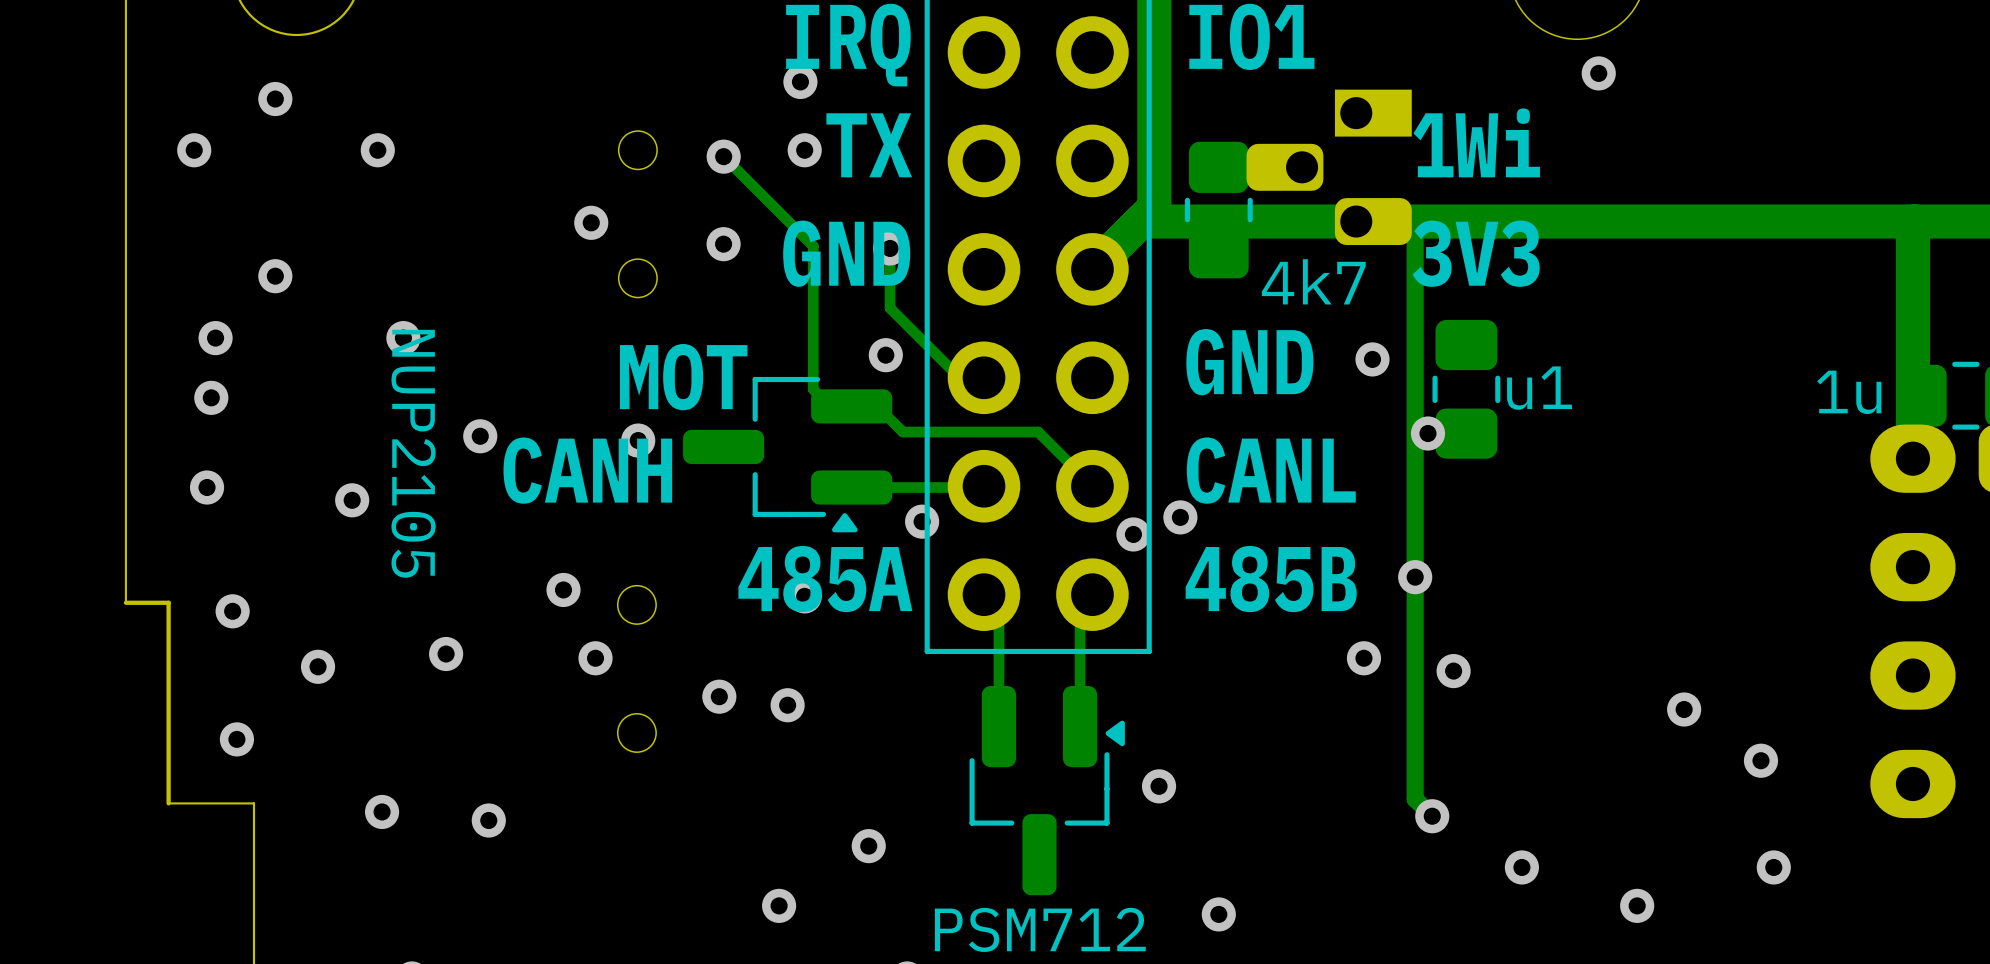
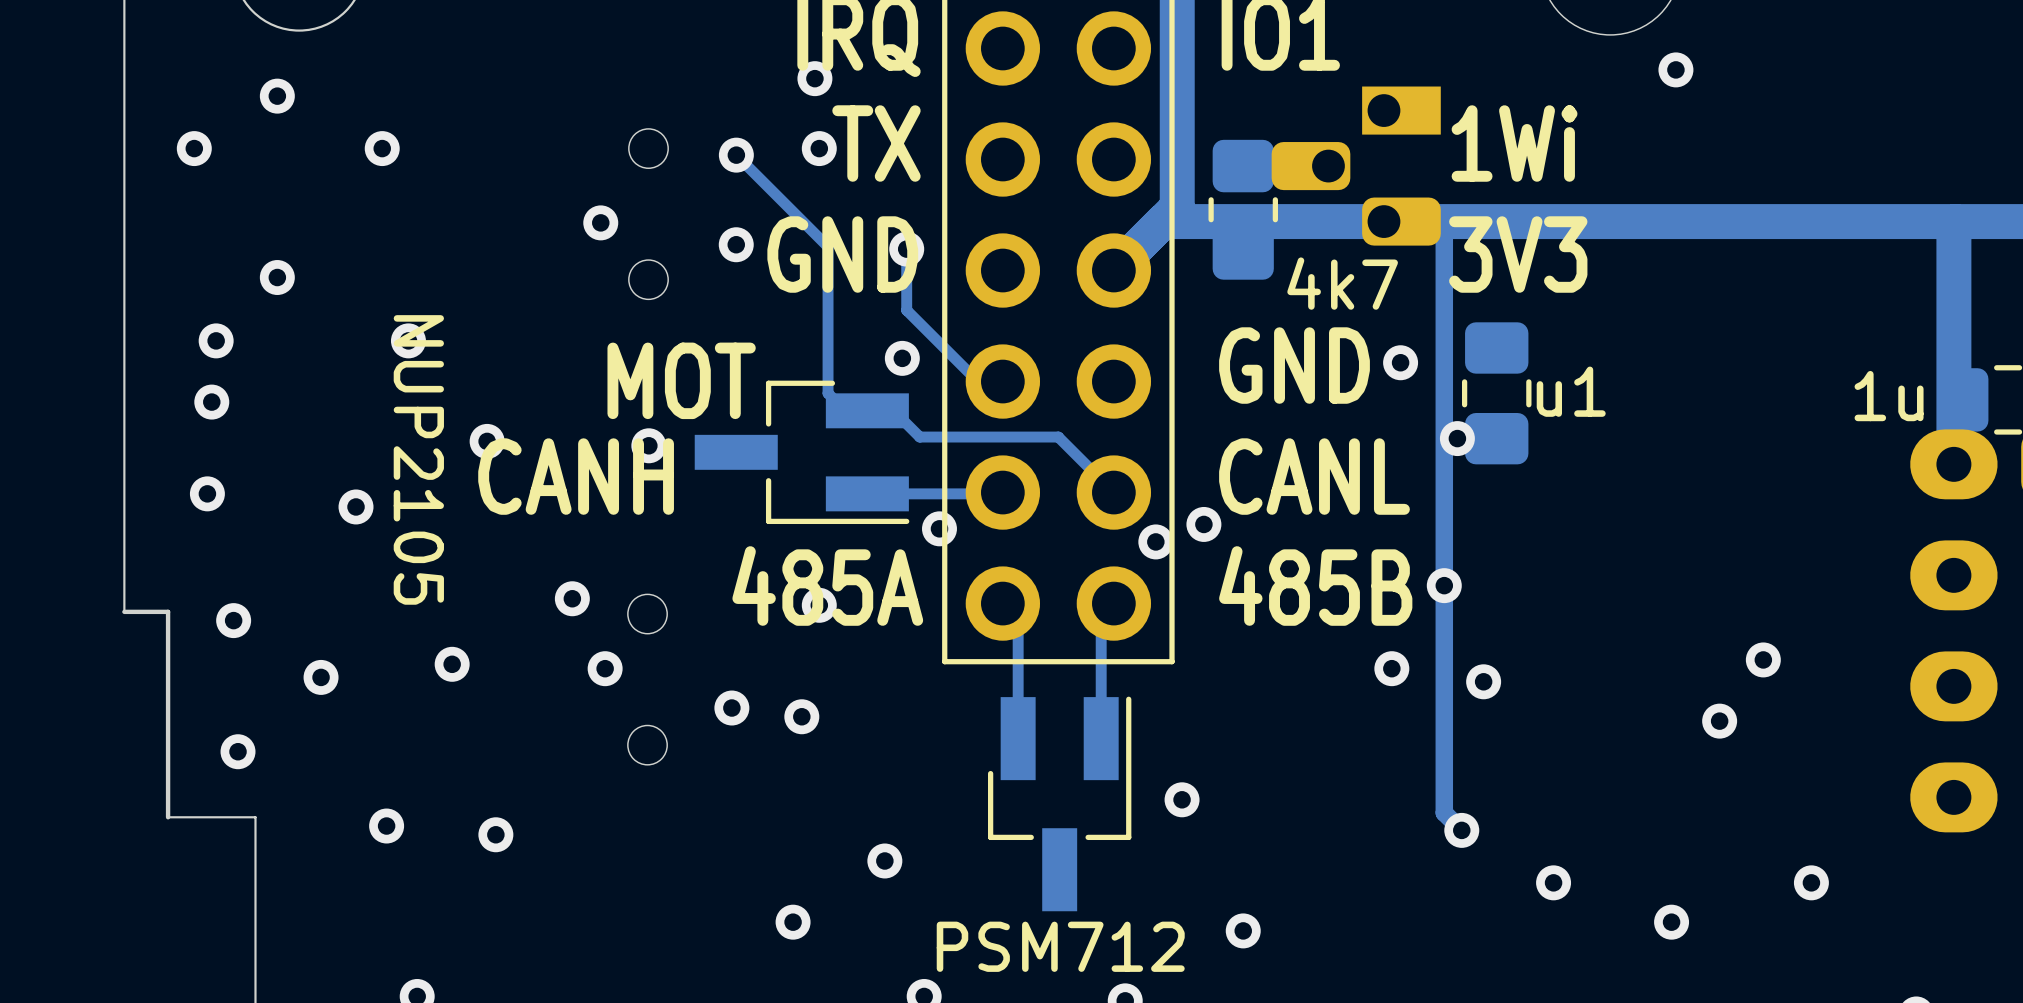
via position: (1598, 73) -> (1675, 69)
part footprint: [683, 376, 893, 533] -> [694, 380, 910, 525]
part footprint: [969, 686, 1125, 896] -> [988, 696, 1132, 912]
via position: (1760, 760) -> (1763, 659)

